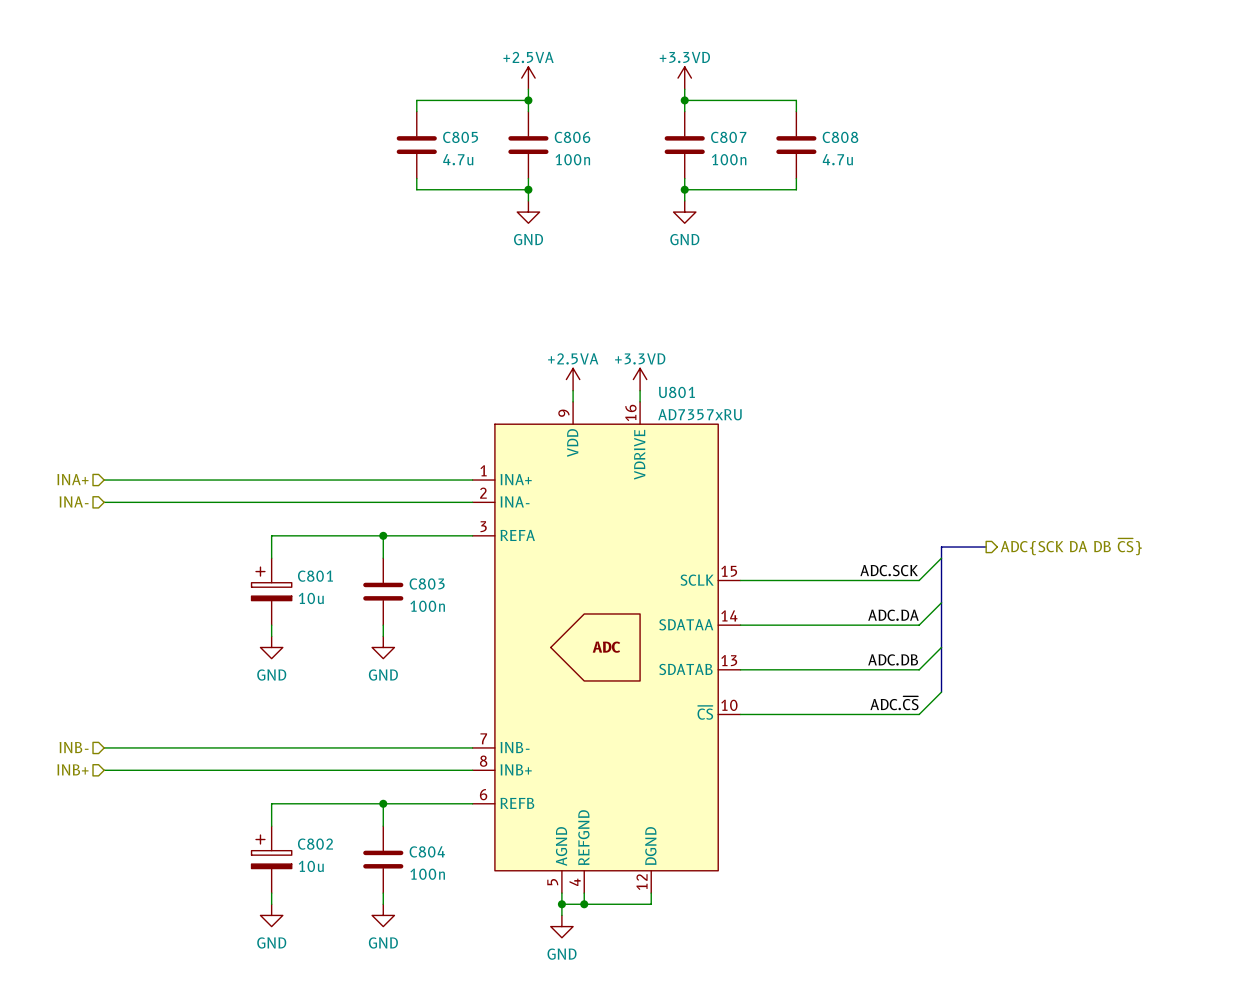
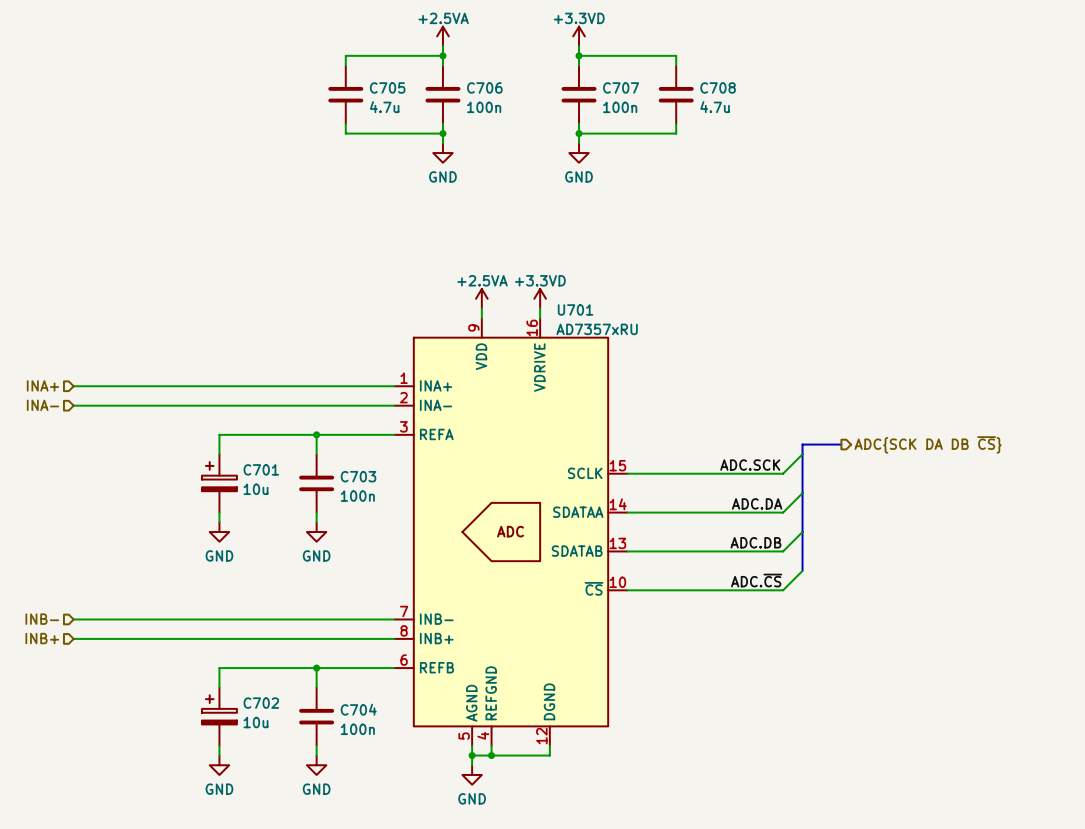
C805 name: C805 (460, 137) -> C705 (387, 87)
C806 name: C806 (572, 137) -> C706 (484, 87)
C807 name: C807 (728, 137) -> C707 (621, 87)
C808 name: C808 (840, 137) -> C708 (718, 87)
U801 name: U801 (676, 392) -> U701 (575, 309)
C801 name: C801 (315, 576) -> C701 (261, 469)
C803 name: C803 (427, 583) -> C703 (358, 476)
C802 name: C802 (315, 844) -> C702 (261, 703)
C804 name: C804 (427, 851) -> C704 (358, 709)

